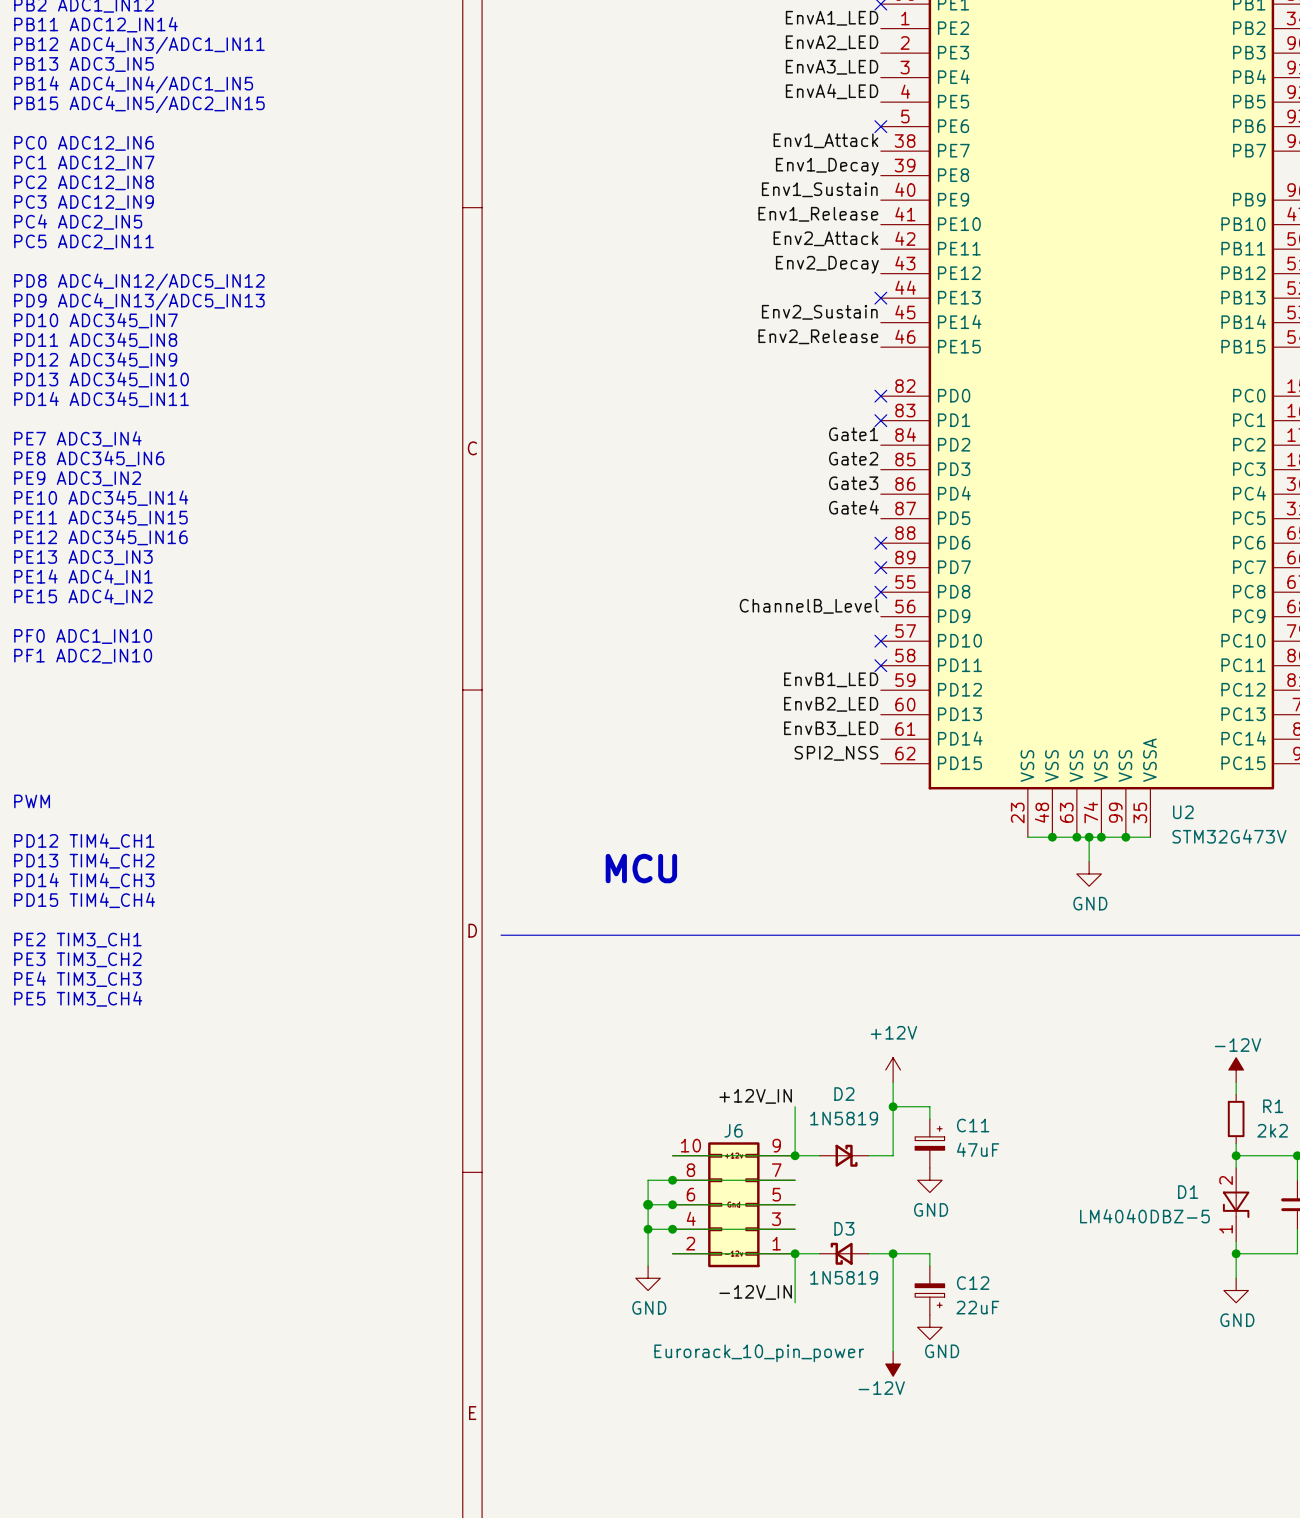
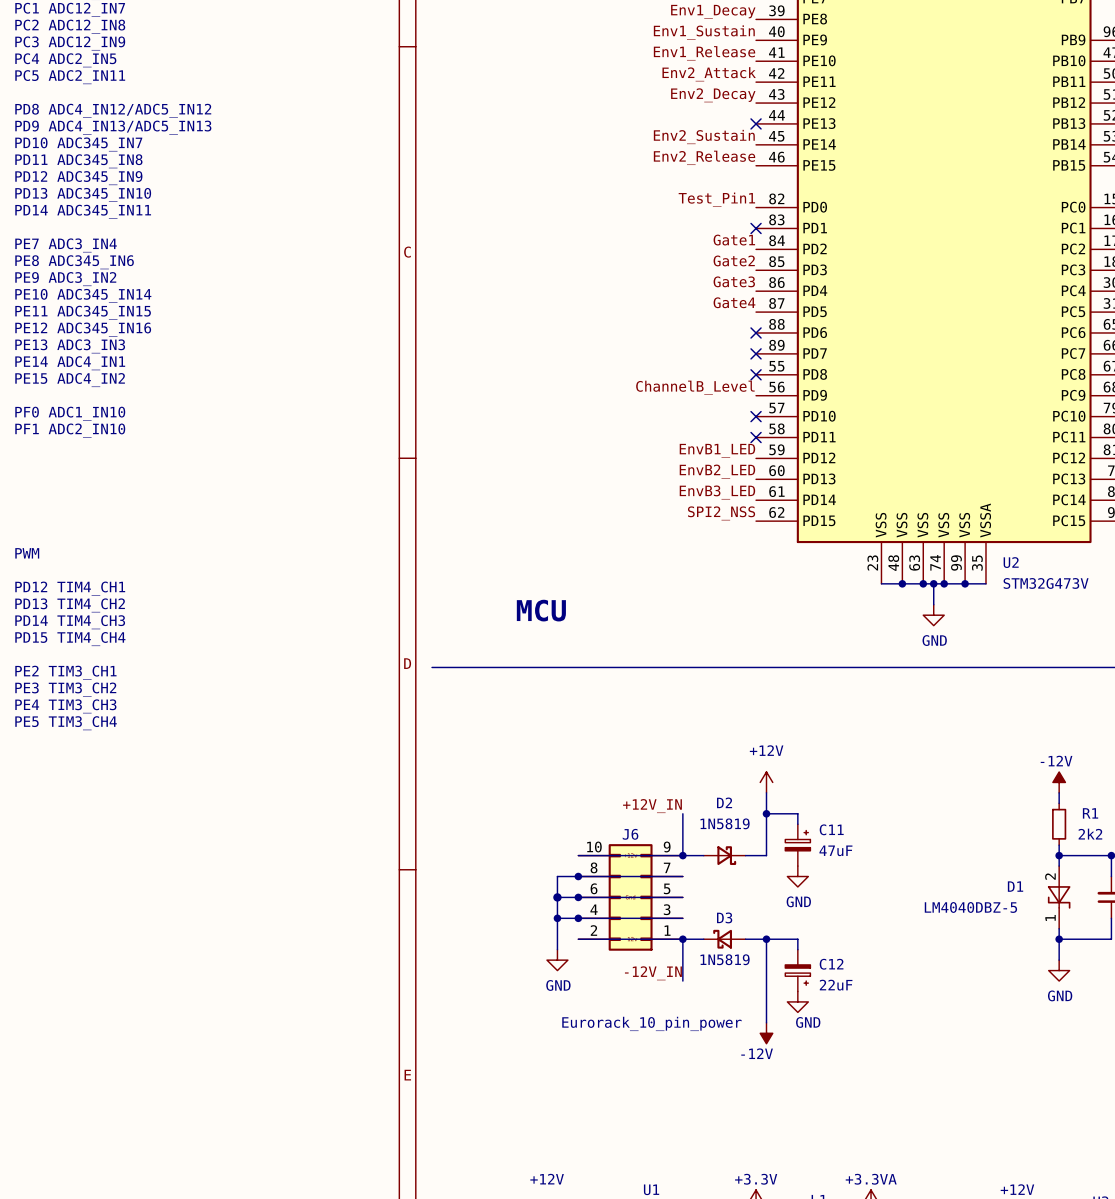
label: none -> Test_Pin1 (716, 199)
no-connect mark: (880, 396) -> none

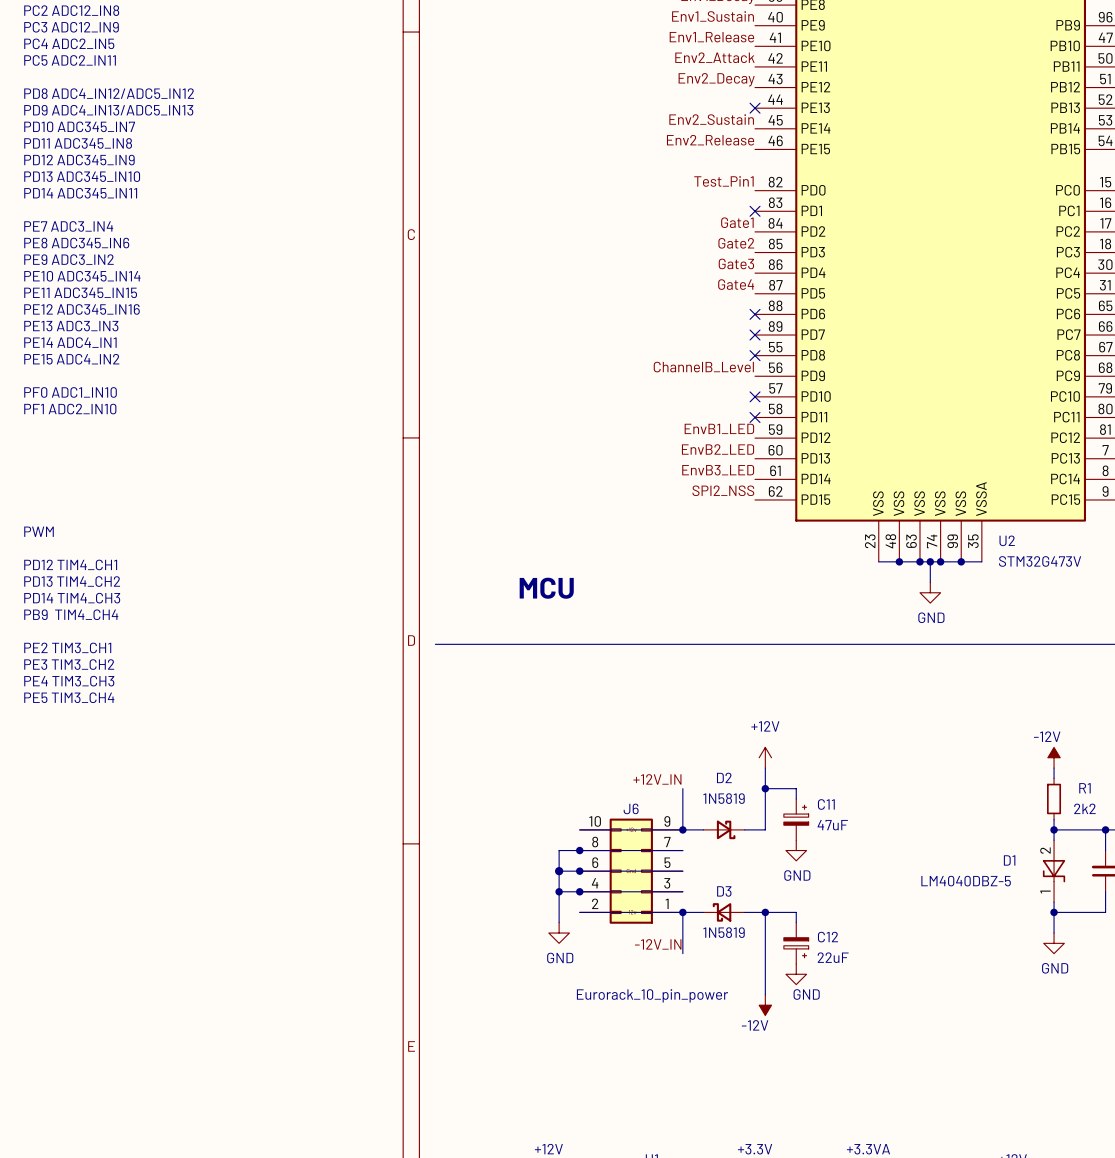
text: PD15 TIM4_CH4 (70, 639) -> PB9 TIM4_CH4 (71, 614)

